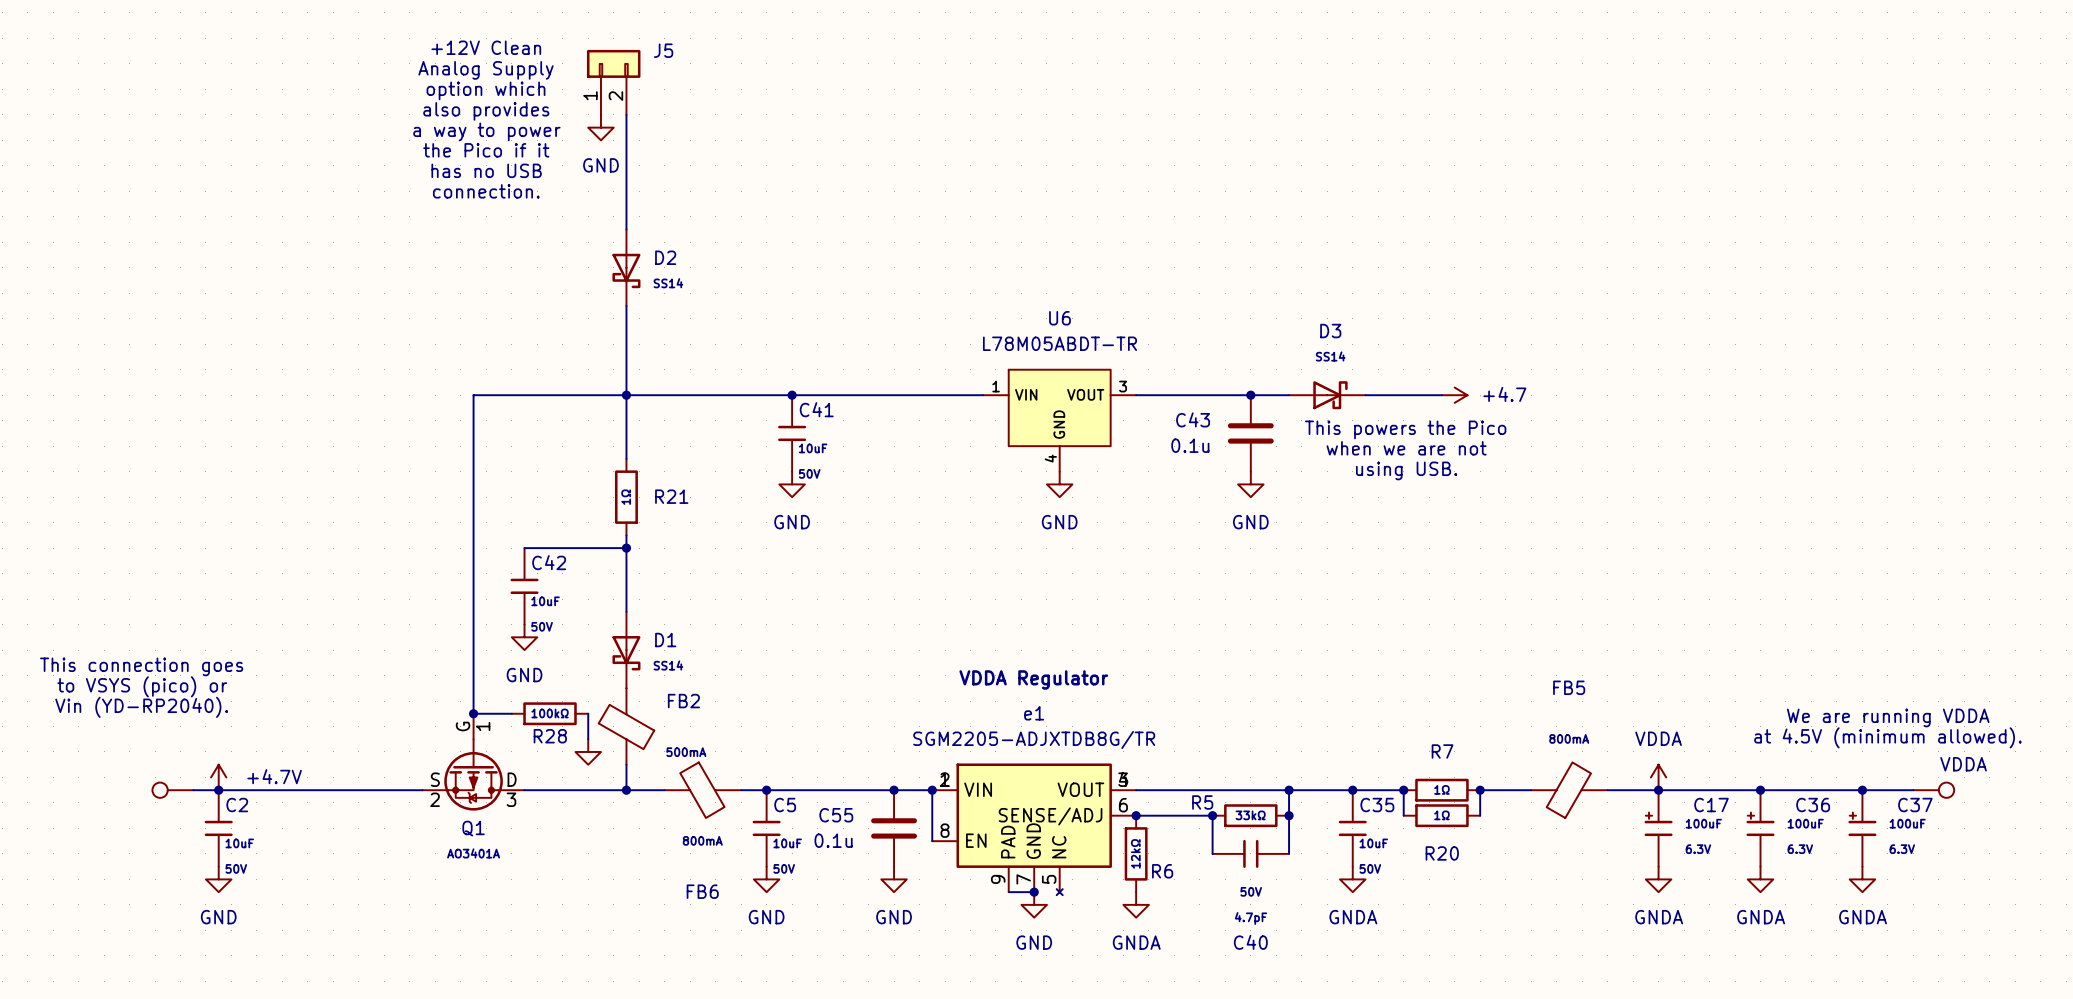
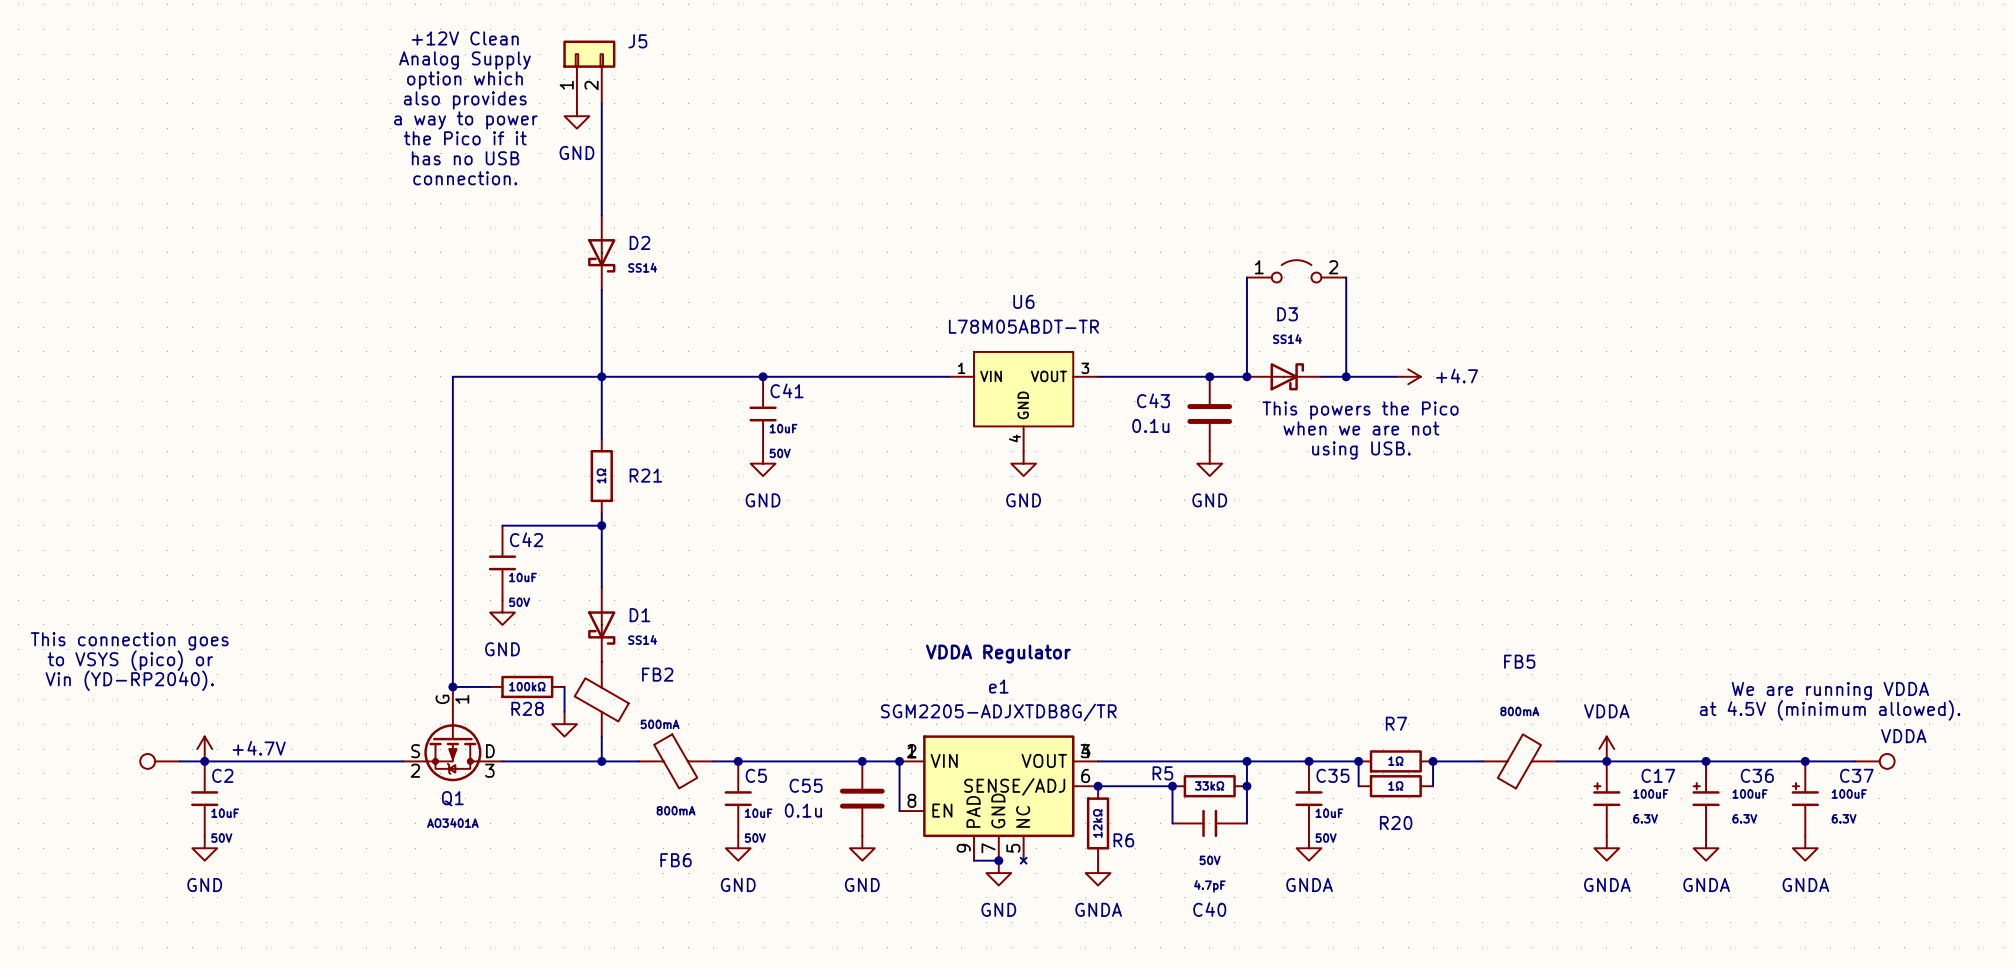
part: none -> (1296, 271)
wire: none -> (1246, 277) (1246, 376)
wire: none -> (1346, 277) (1346, 376)
junction: none -> (1246, 376)
junction: none -> (1346, 376)

